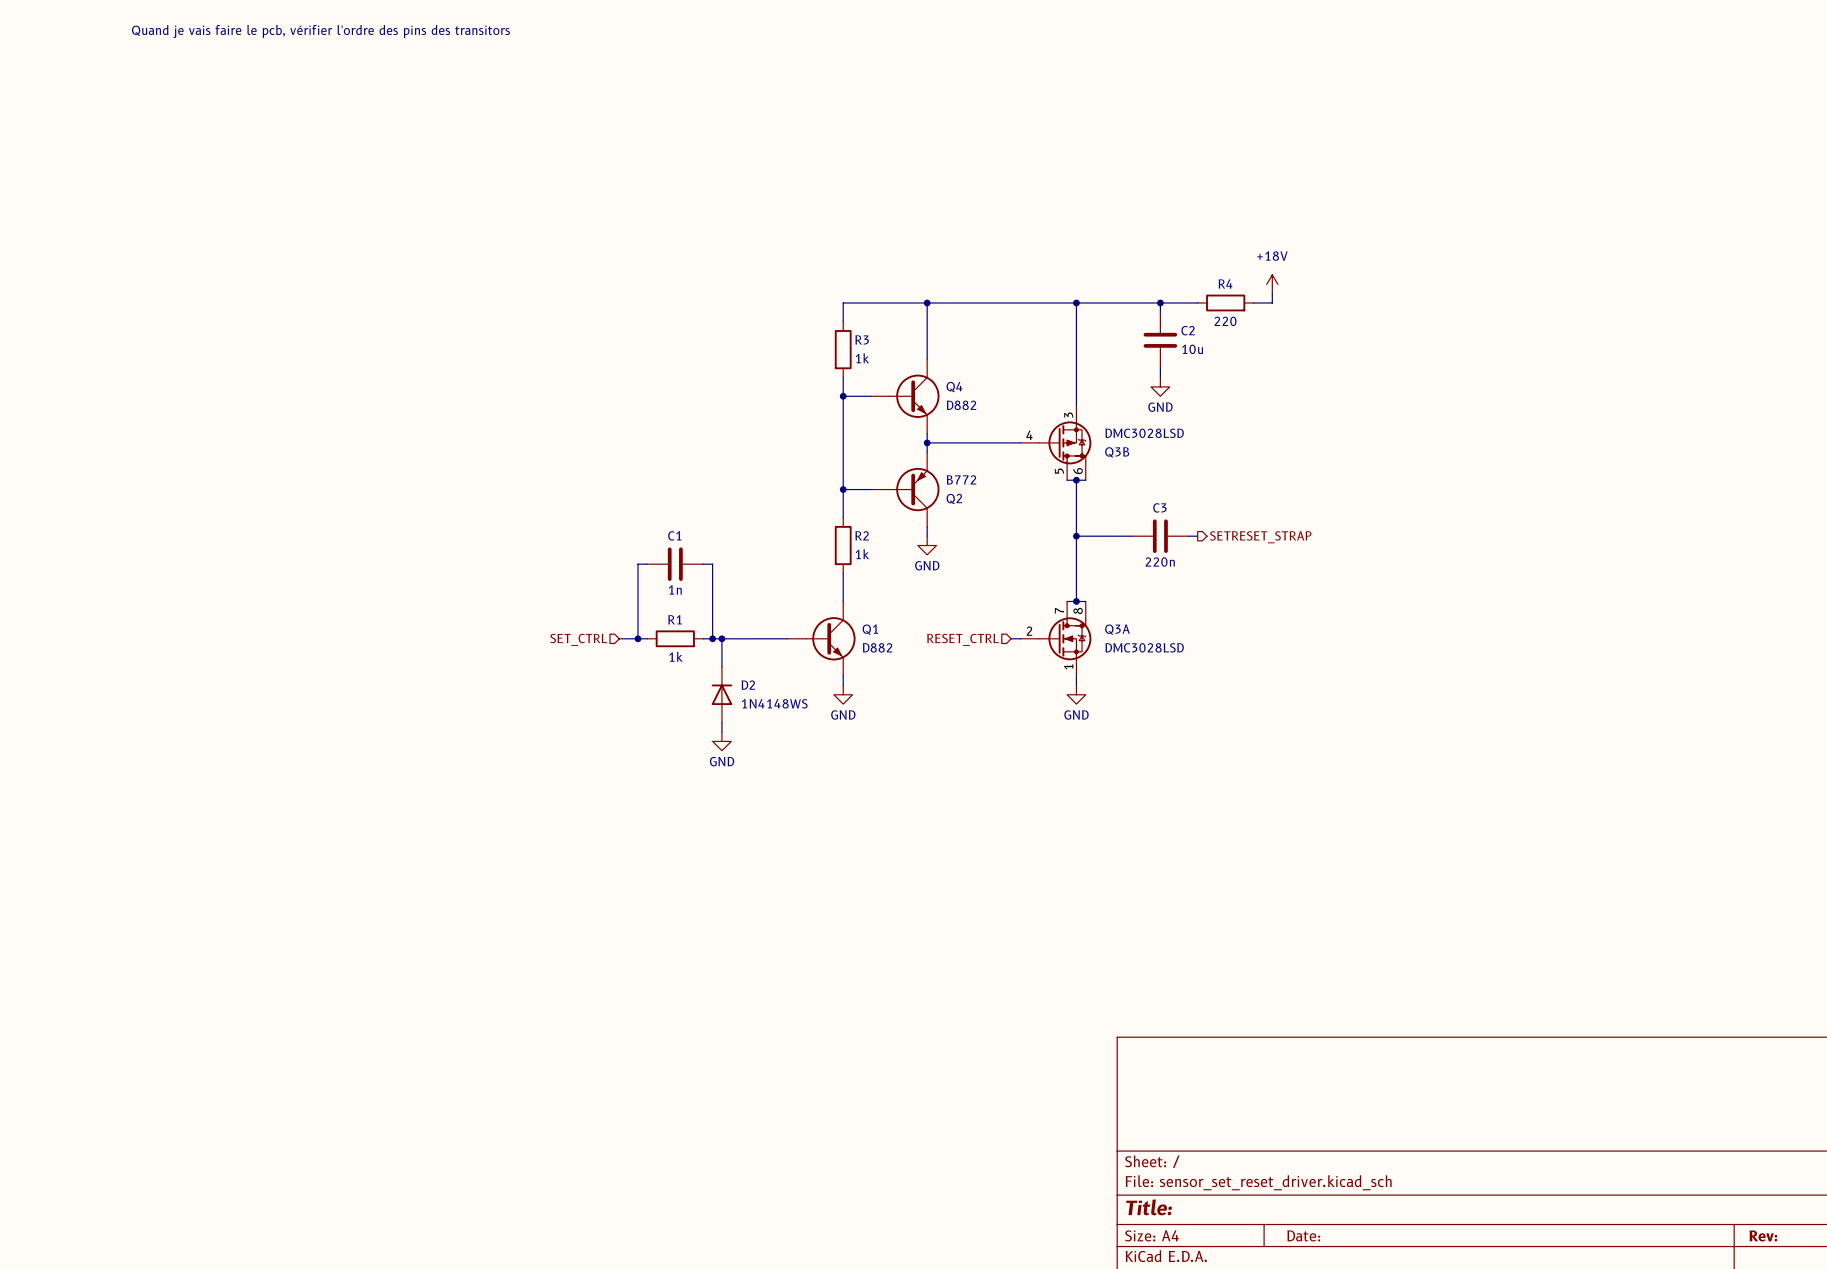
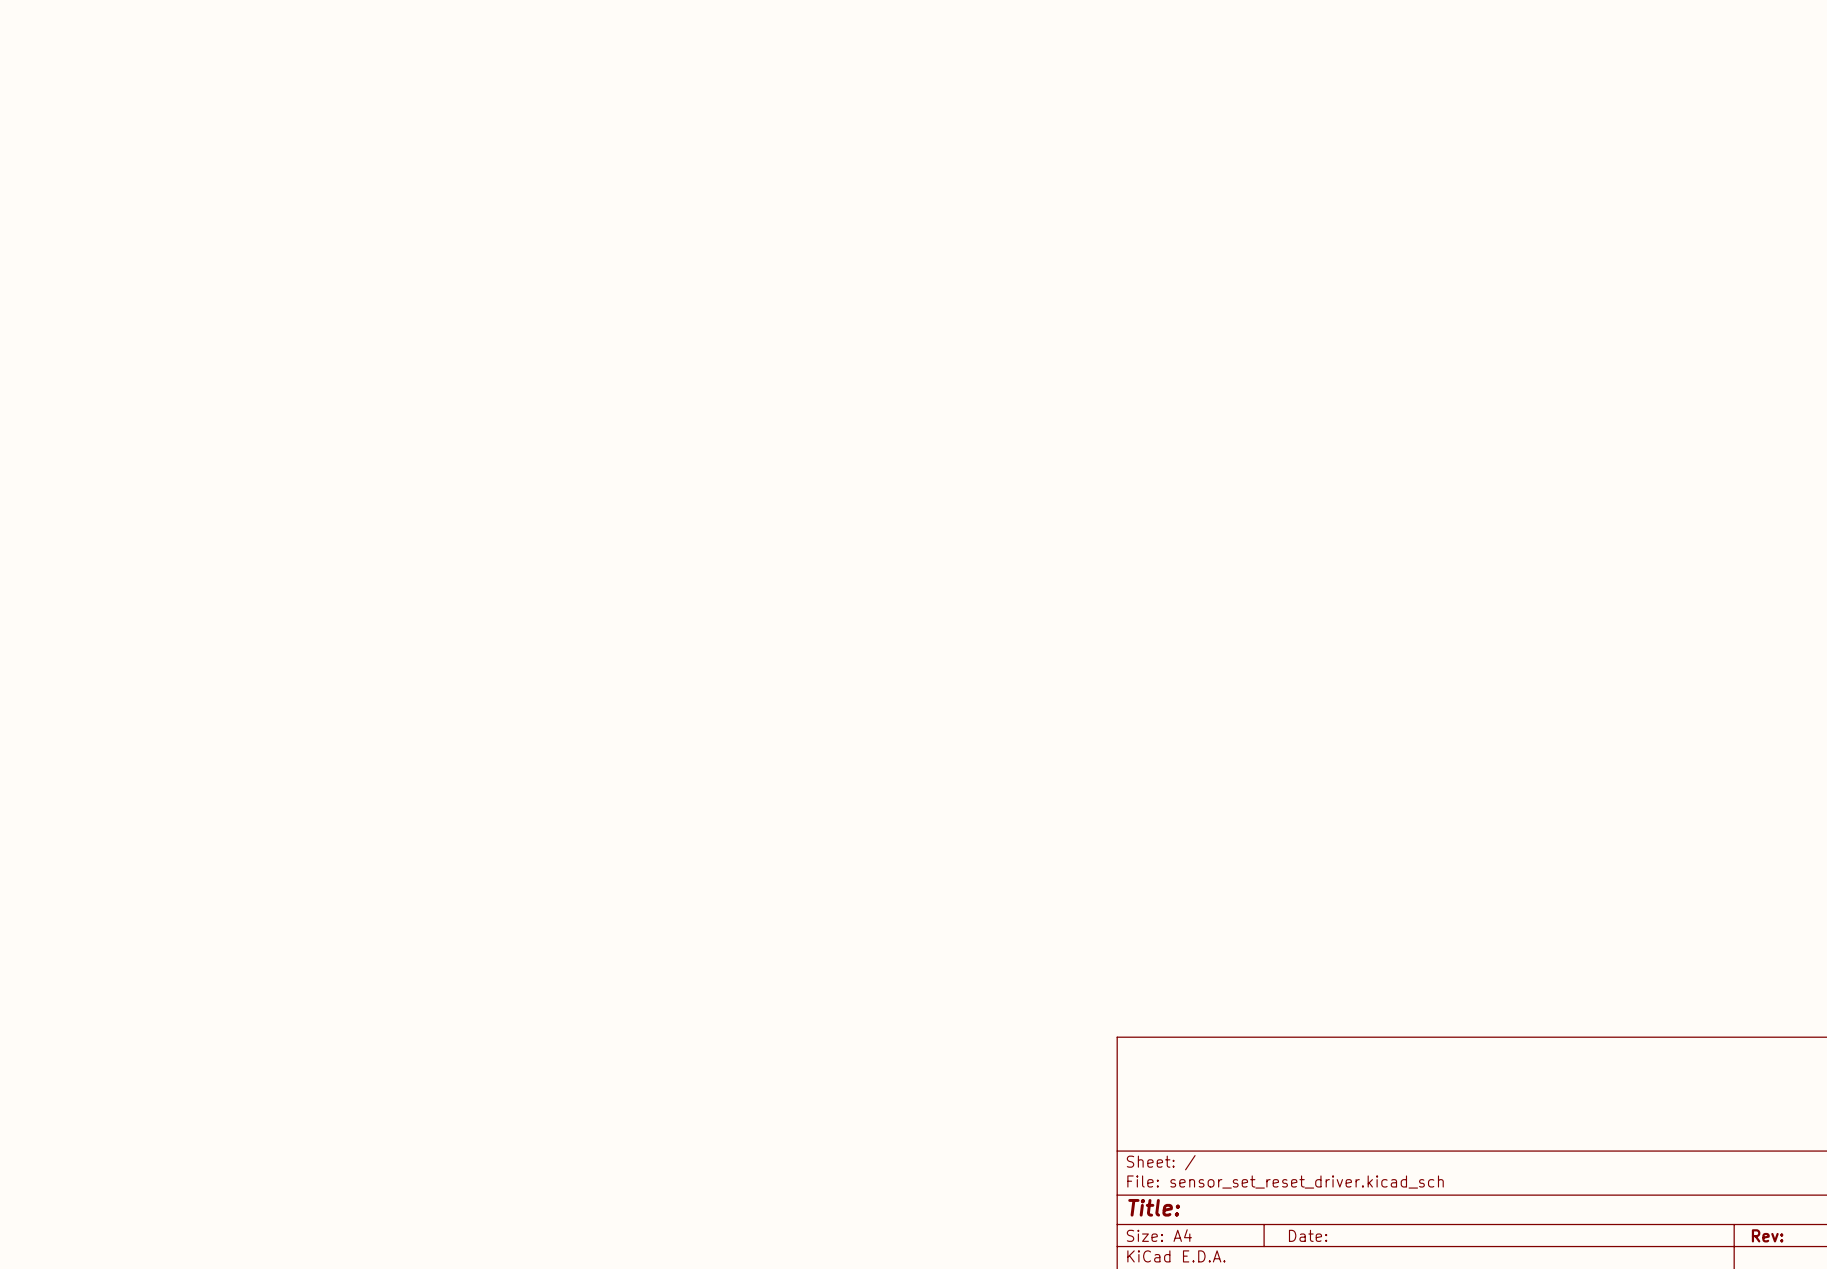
text: Quand je vais faire le pcb, vérifier l'ordre des pins des transitors (320, 31) -> none
power symbol: +18V (1272, 284) -> none
wire: (1272, 293) (1272, 302) (1253, 302) -> none
wire: (927, 302) (927, 358) -> none
junction: (927, 302) -> none
wire: (1076, 302) (1076, 405) -> none
junction: (1076, 302) -> none
wire: (1160, 302) (1160, 312) -> none
junction: (1160, 302) -> none
wire: (1197, 302) (843, 302) (843, 321) -> none
R4: 220 (1225, 302) -> none
C2: 10u (1160, 340) -> none
R3: 1k (843, 349) -> none
wire: (1160, 368) (1160, 377) -> none
wire: (843, 377) (843, 517) -> none
power symbol: GND (1160, 386) -> none
wire: (843, 396) (871, 396) -> none
junction: (843, 396) -> none
Q4: D882 (905, 396) -> none
wire: (927, 433) (927, 452) -> none
wire: (927, 442) (1020, 442) -> none
junction: (927, 442) -> none
Q3B: DMC3028LSD (1055, 442) -> none
wire: (1067, 480) (1085, 480) -> none
wire: (1076, 480) (1076, 601) -> none
junction: (1076, 480) -> none
wire: (843, 489) (871, 489) -> none
junction: (843, 489) -> none
Q2: B772 (905, 489) -> none
wire: (927, 526) (927, 536) -> none
wire: (1076, 536) (1132, 536) -> none
junction: (1076, 536) -> none
C3: 220n (1160, 536) -> none
wire: (1188, 536) (1197, 536) -> none
hierarchical label: SETRESET_STRAP (1260, 537) -> none
R2: 1k (843, 545) -> none
power symbol: GND (927, 545) -> none
wire: (647, 564) (637, 564) (637, 638) -> none
C1: 1n (675, 564) -> none
wire: (703, 564) (712, 564) (712, 638) -> none
wire: (843, 573) (843, 601) -> none
wire: (1067, 601) (1085, 601) -> none
junction: (1076, 601) -> none
wire: (619, 638) (647, 638) -> none
junction: (637, 638) -> none
R1: 1k (675, 638) -> none
wire: (703, 638) (787, 638) -> none
junction: (712, 638) -> none
wire: (721, 638) (721, 666) -> none
junction: (721, 638) -> none
Q1: D882 (821, 638) -> none
wire: (1011, 638) (1020, 638) -> none
Q3A: DMC3028LSD (1055, 638) -> none
hierarchical label: SET_CTRL (578, 639) -> none
hierarchical label: RESET_CTRL (963, 639) -> none
wire: (843, 676) (843, 685) -> none
wire: (1076, 676) (1076, 685) -> none
D2: 1N4148WS (721, 694) -> none
power symbol: GND (843, 694) -> none
power symbol: GND (1076, 694) -> none
wire: (721, 722) (721, 732) -> none
power symbol: GND (721, 741) -> none

